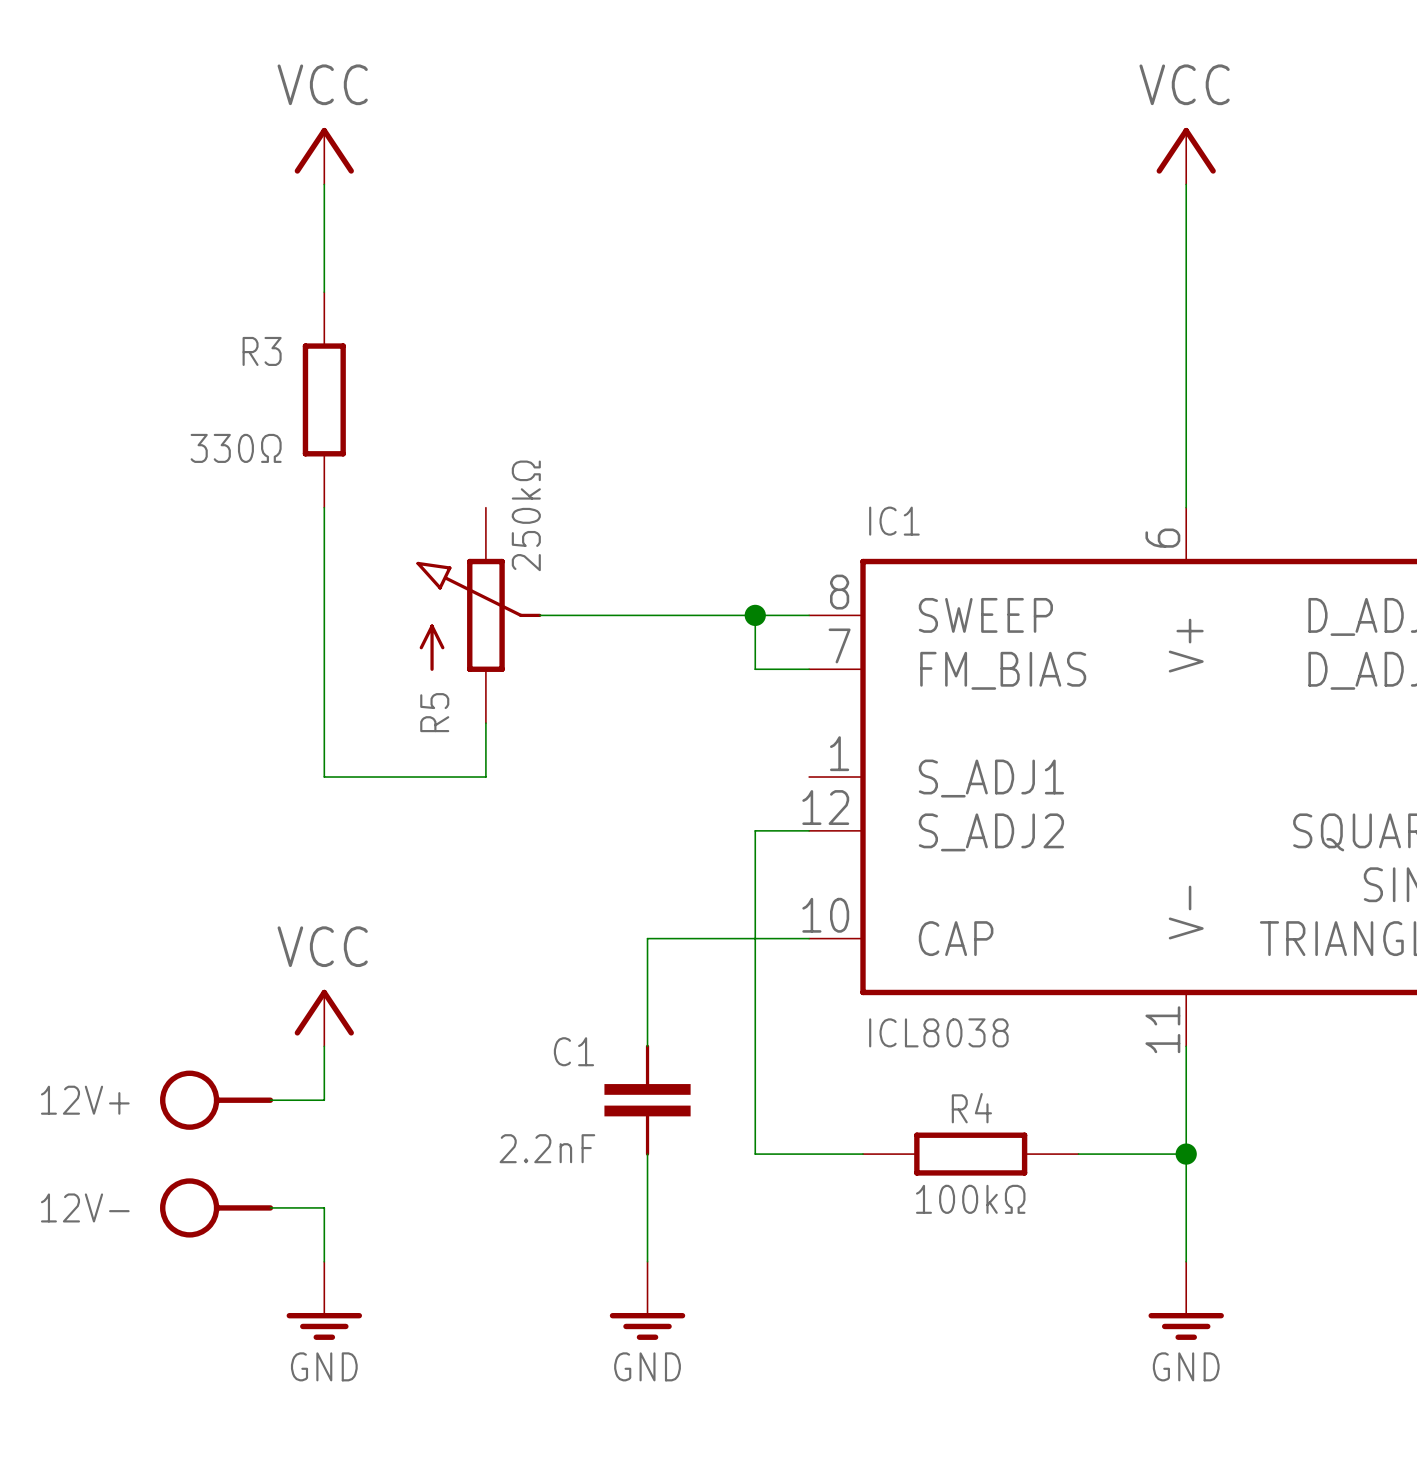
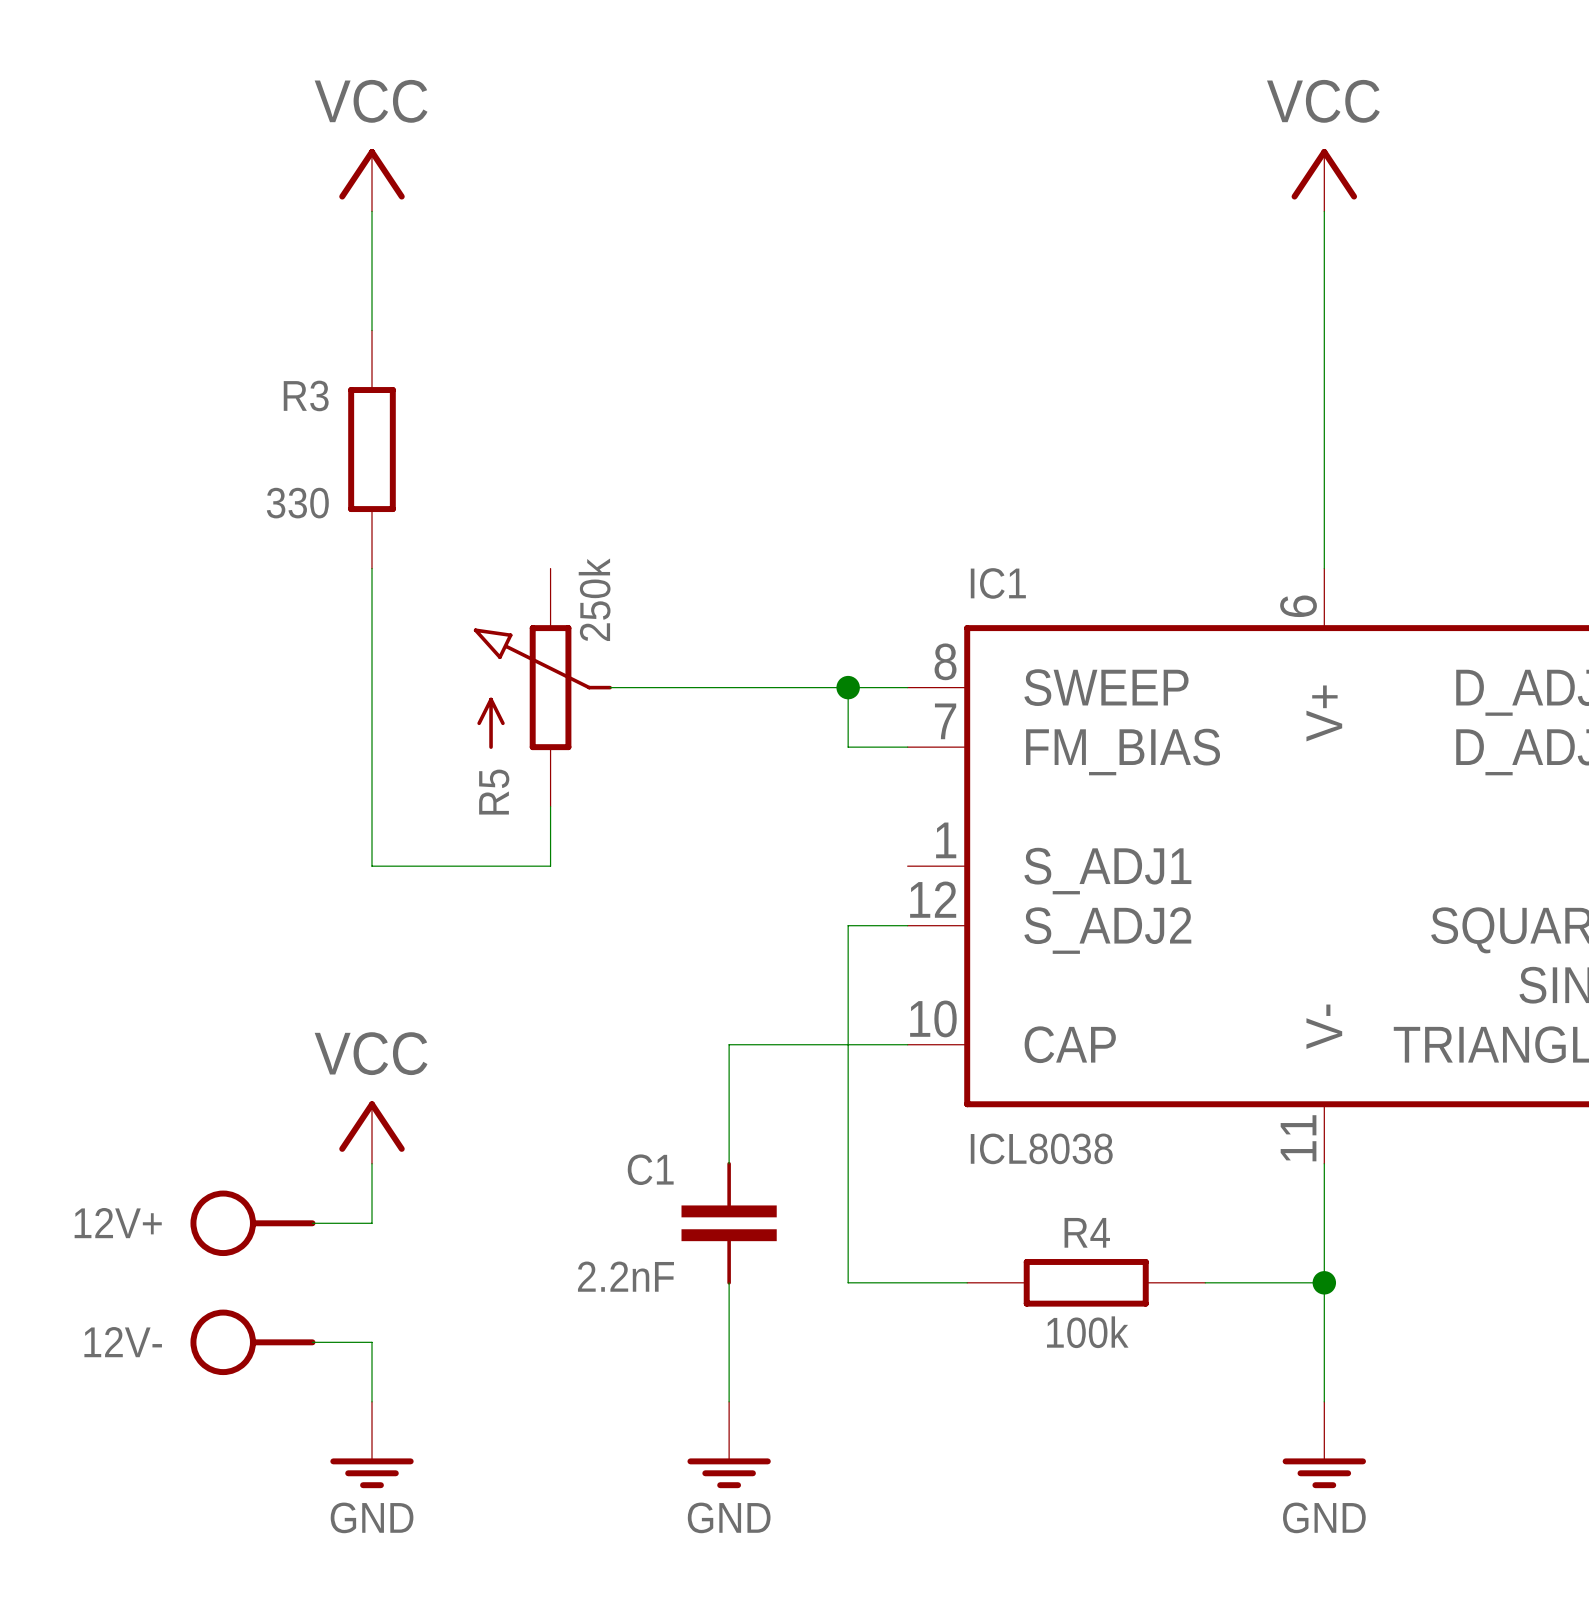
R3 value: 330Ω (236, 448) -> 330 (297, 503)
R5 value: 250kΩ (526, 515) -> 250k (594, 599)
R4 value: 100kΩ (970, 1199) -> 100k (1087, 1332)

